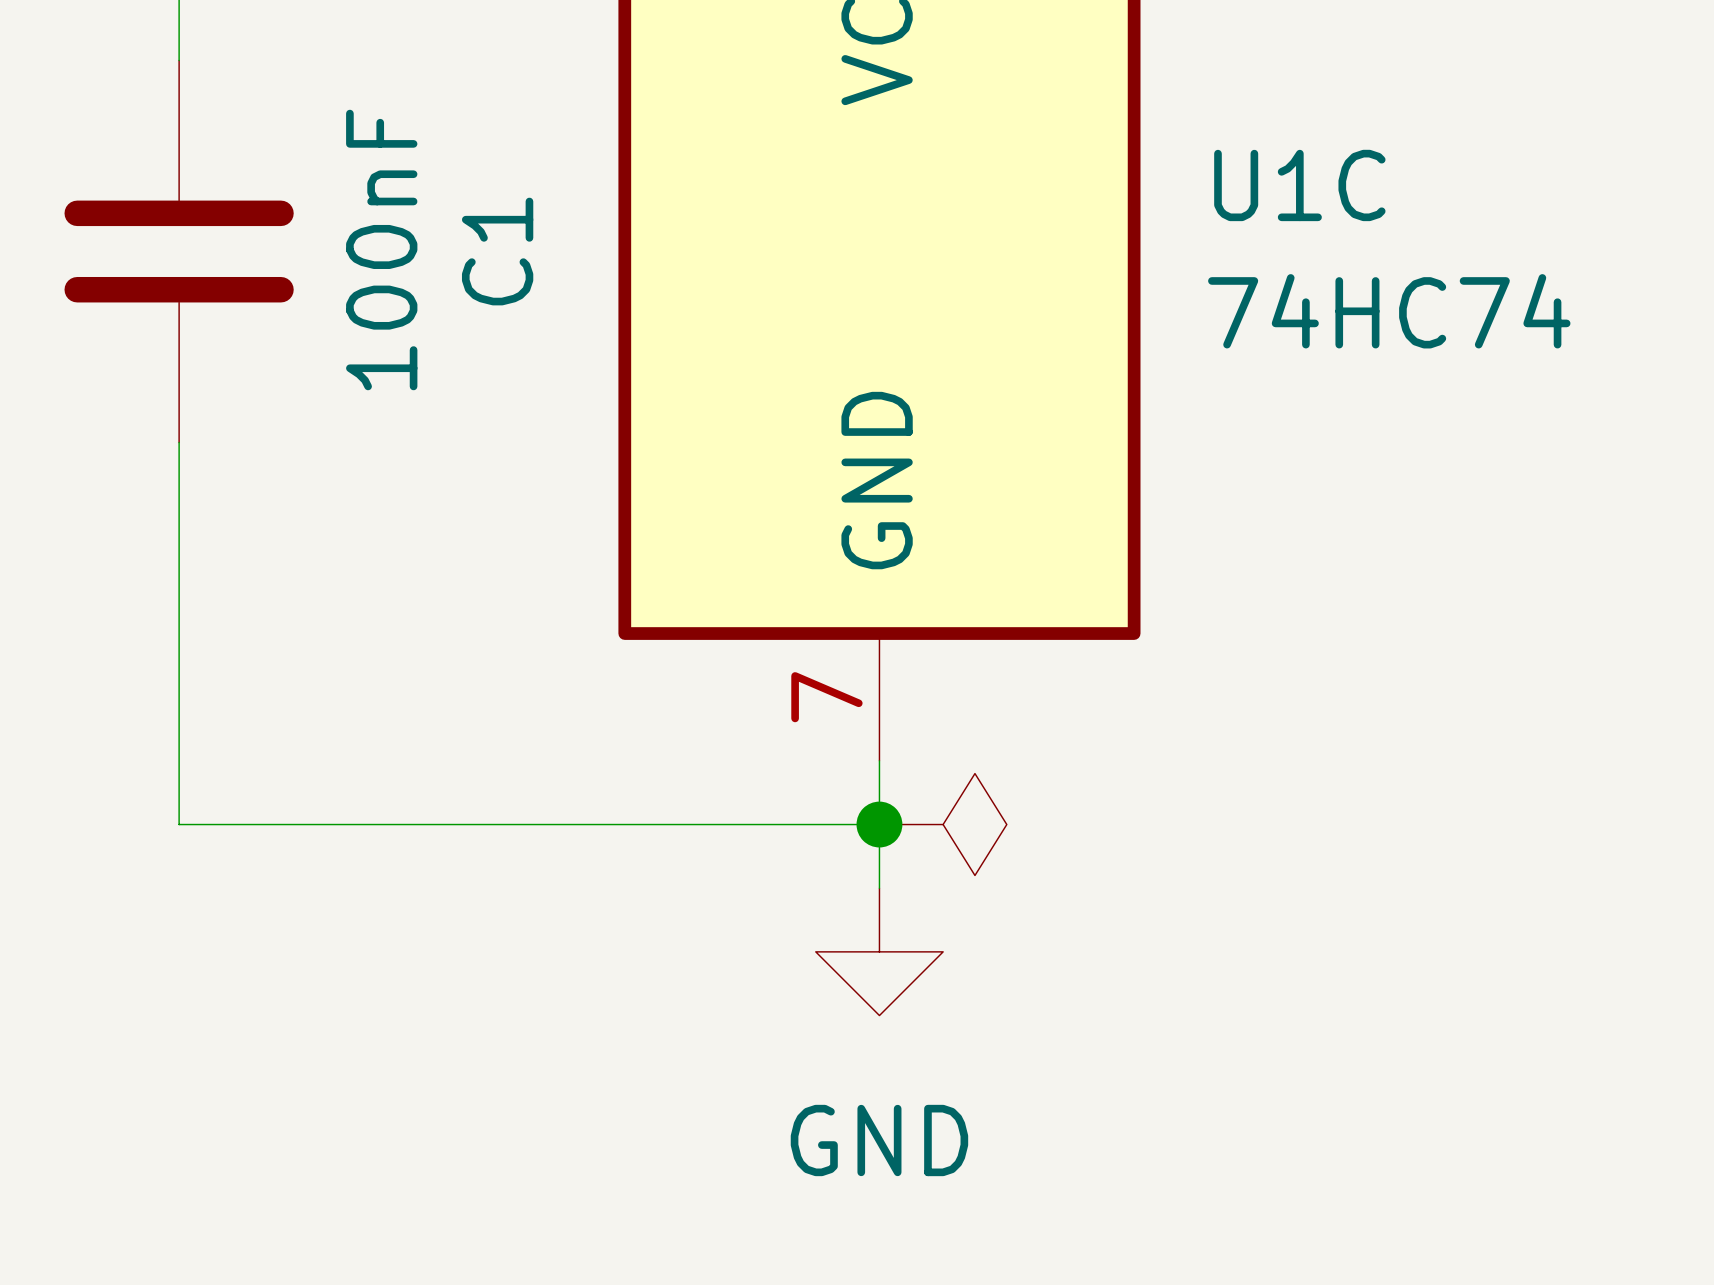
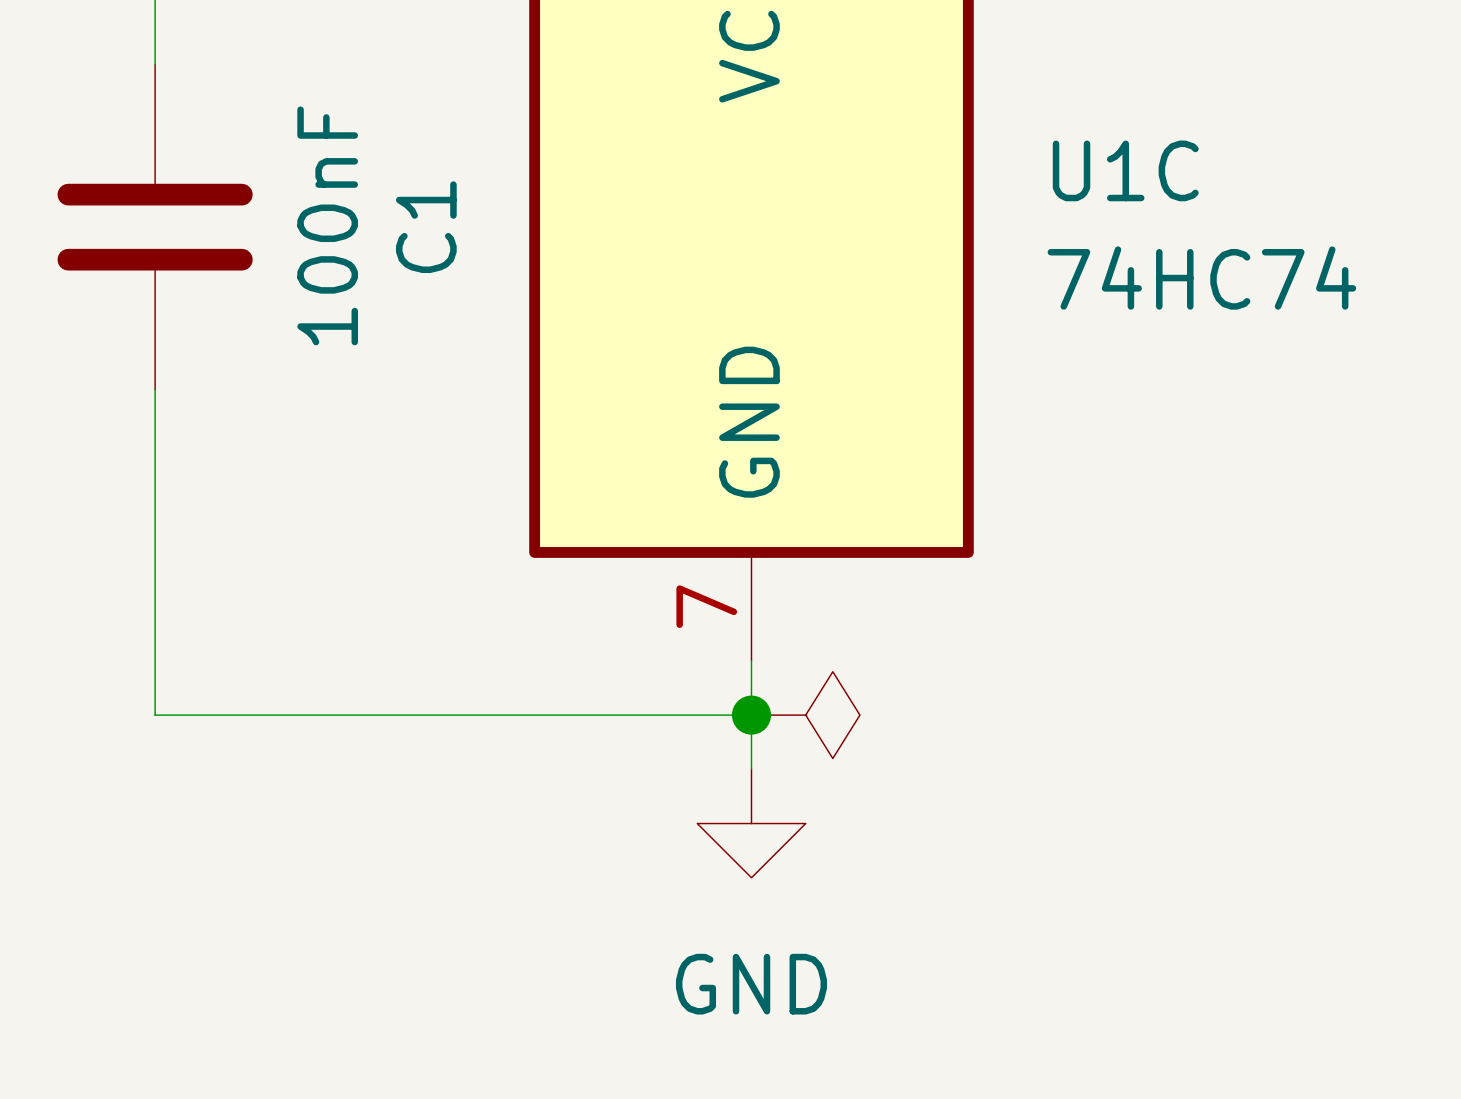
U1C name position: U1C (1299, 185) -> U1C (1125, 170)
U1C value position: 74HC74 (1389, 311) -> 74HC74 (1201, 278)

